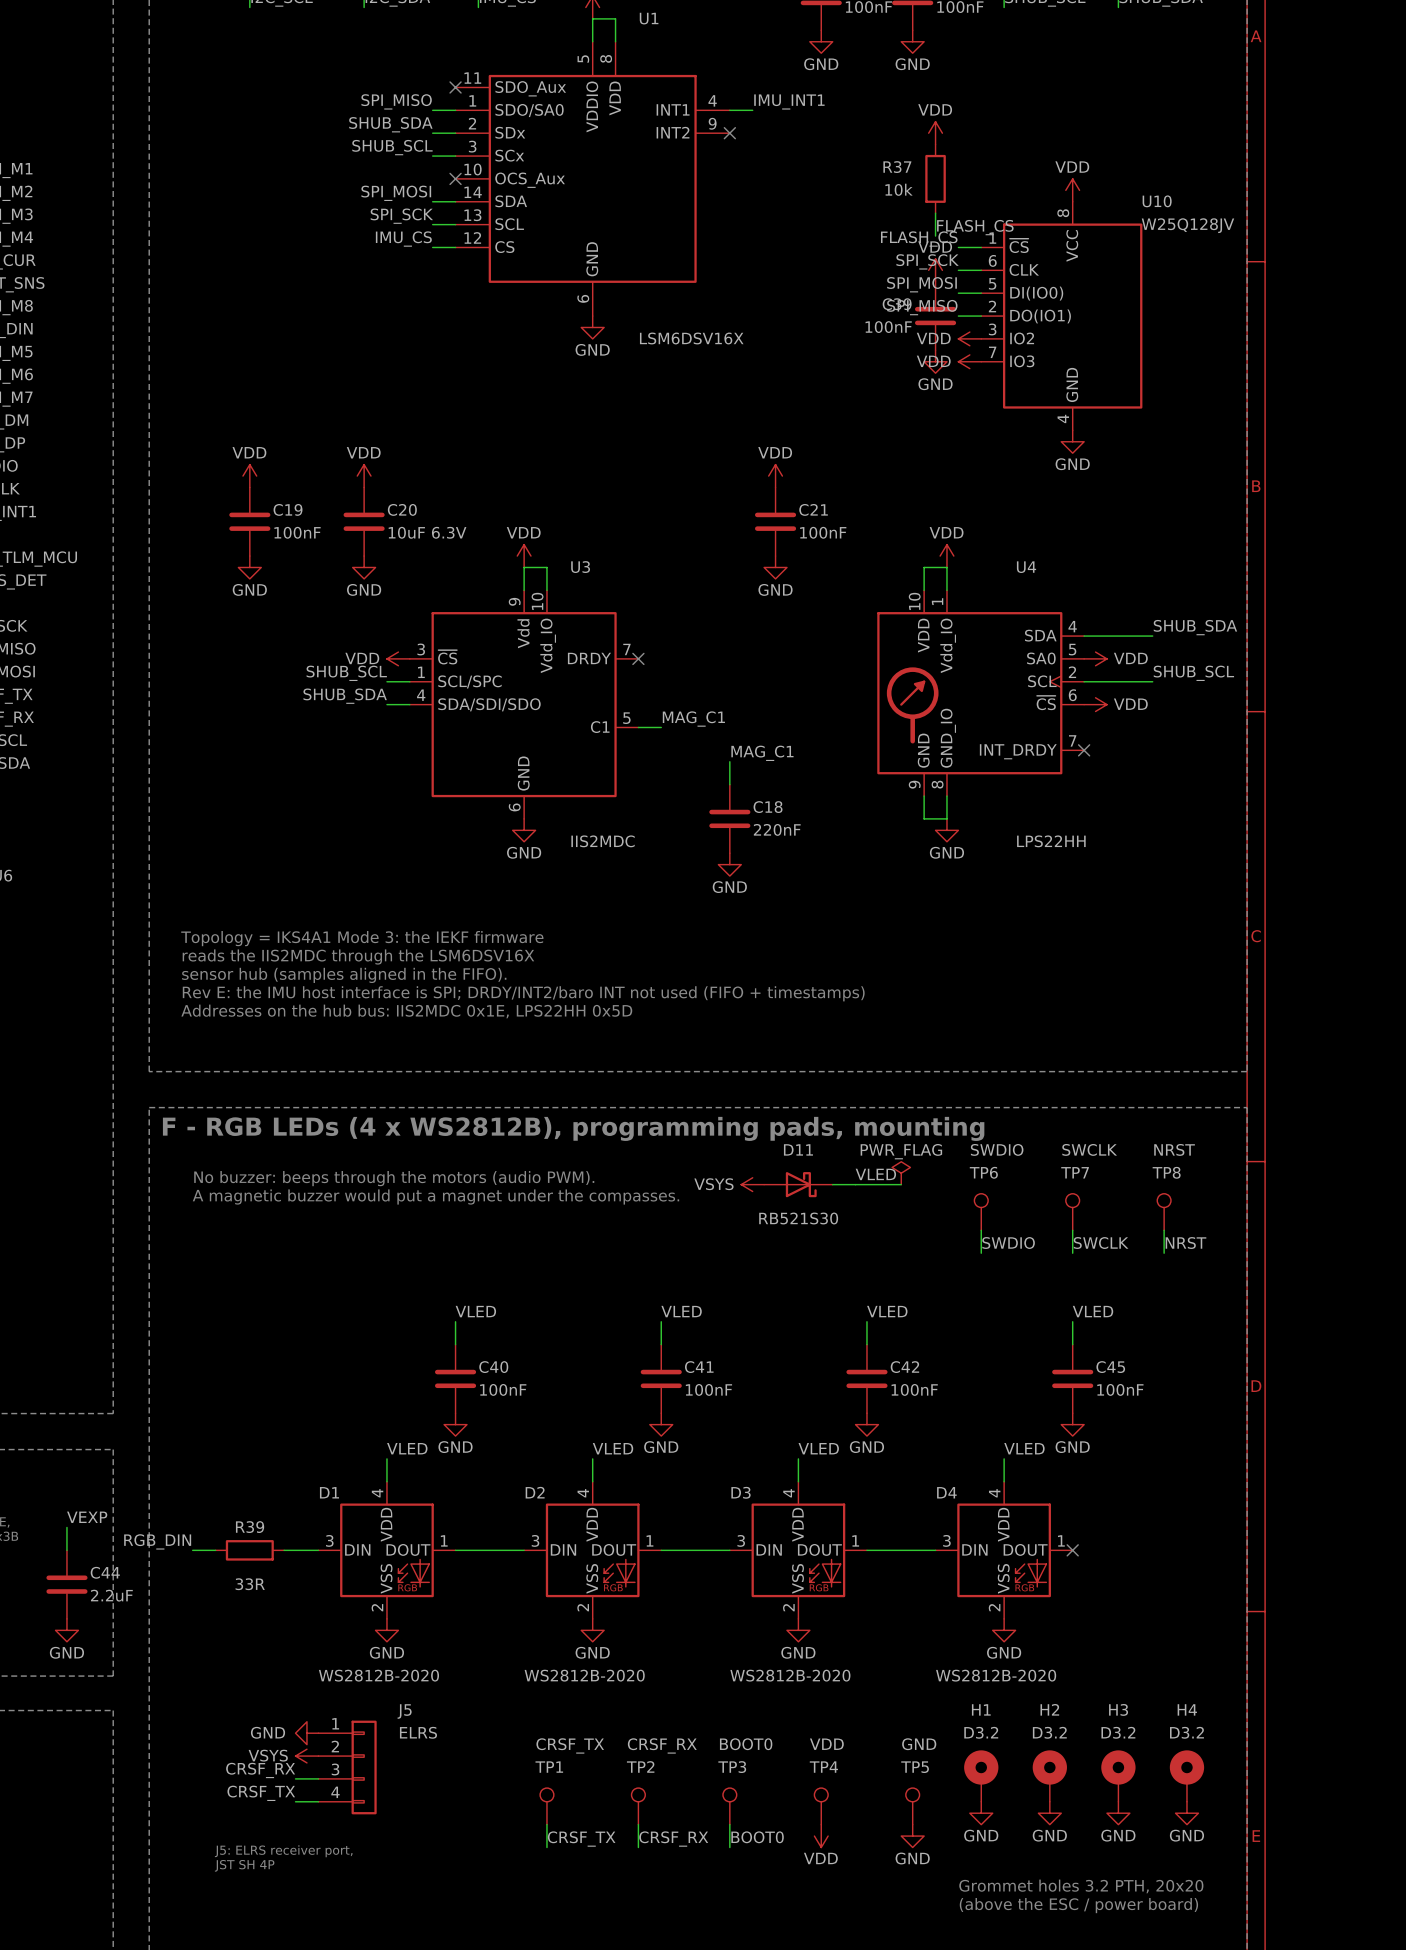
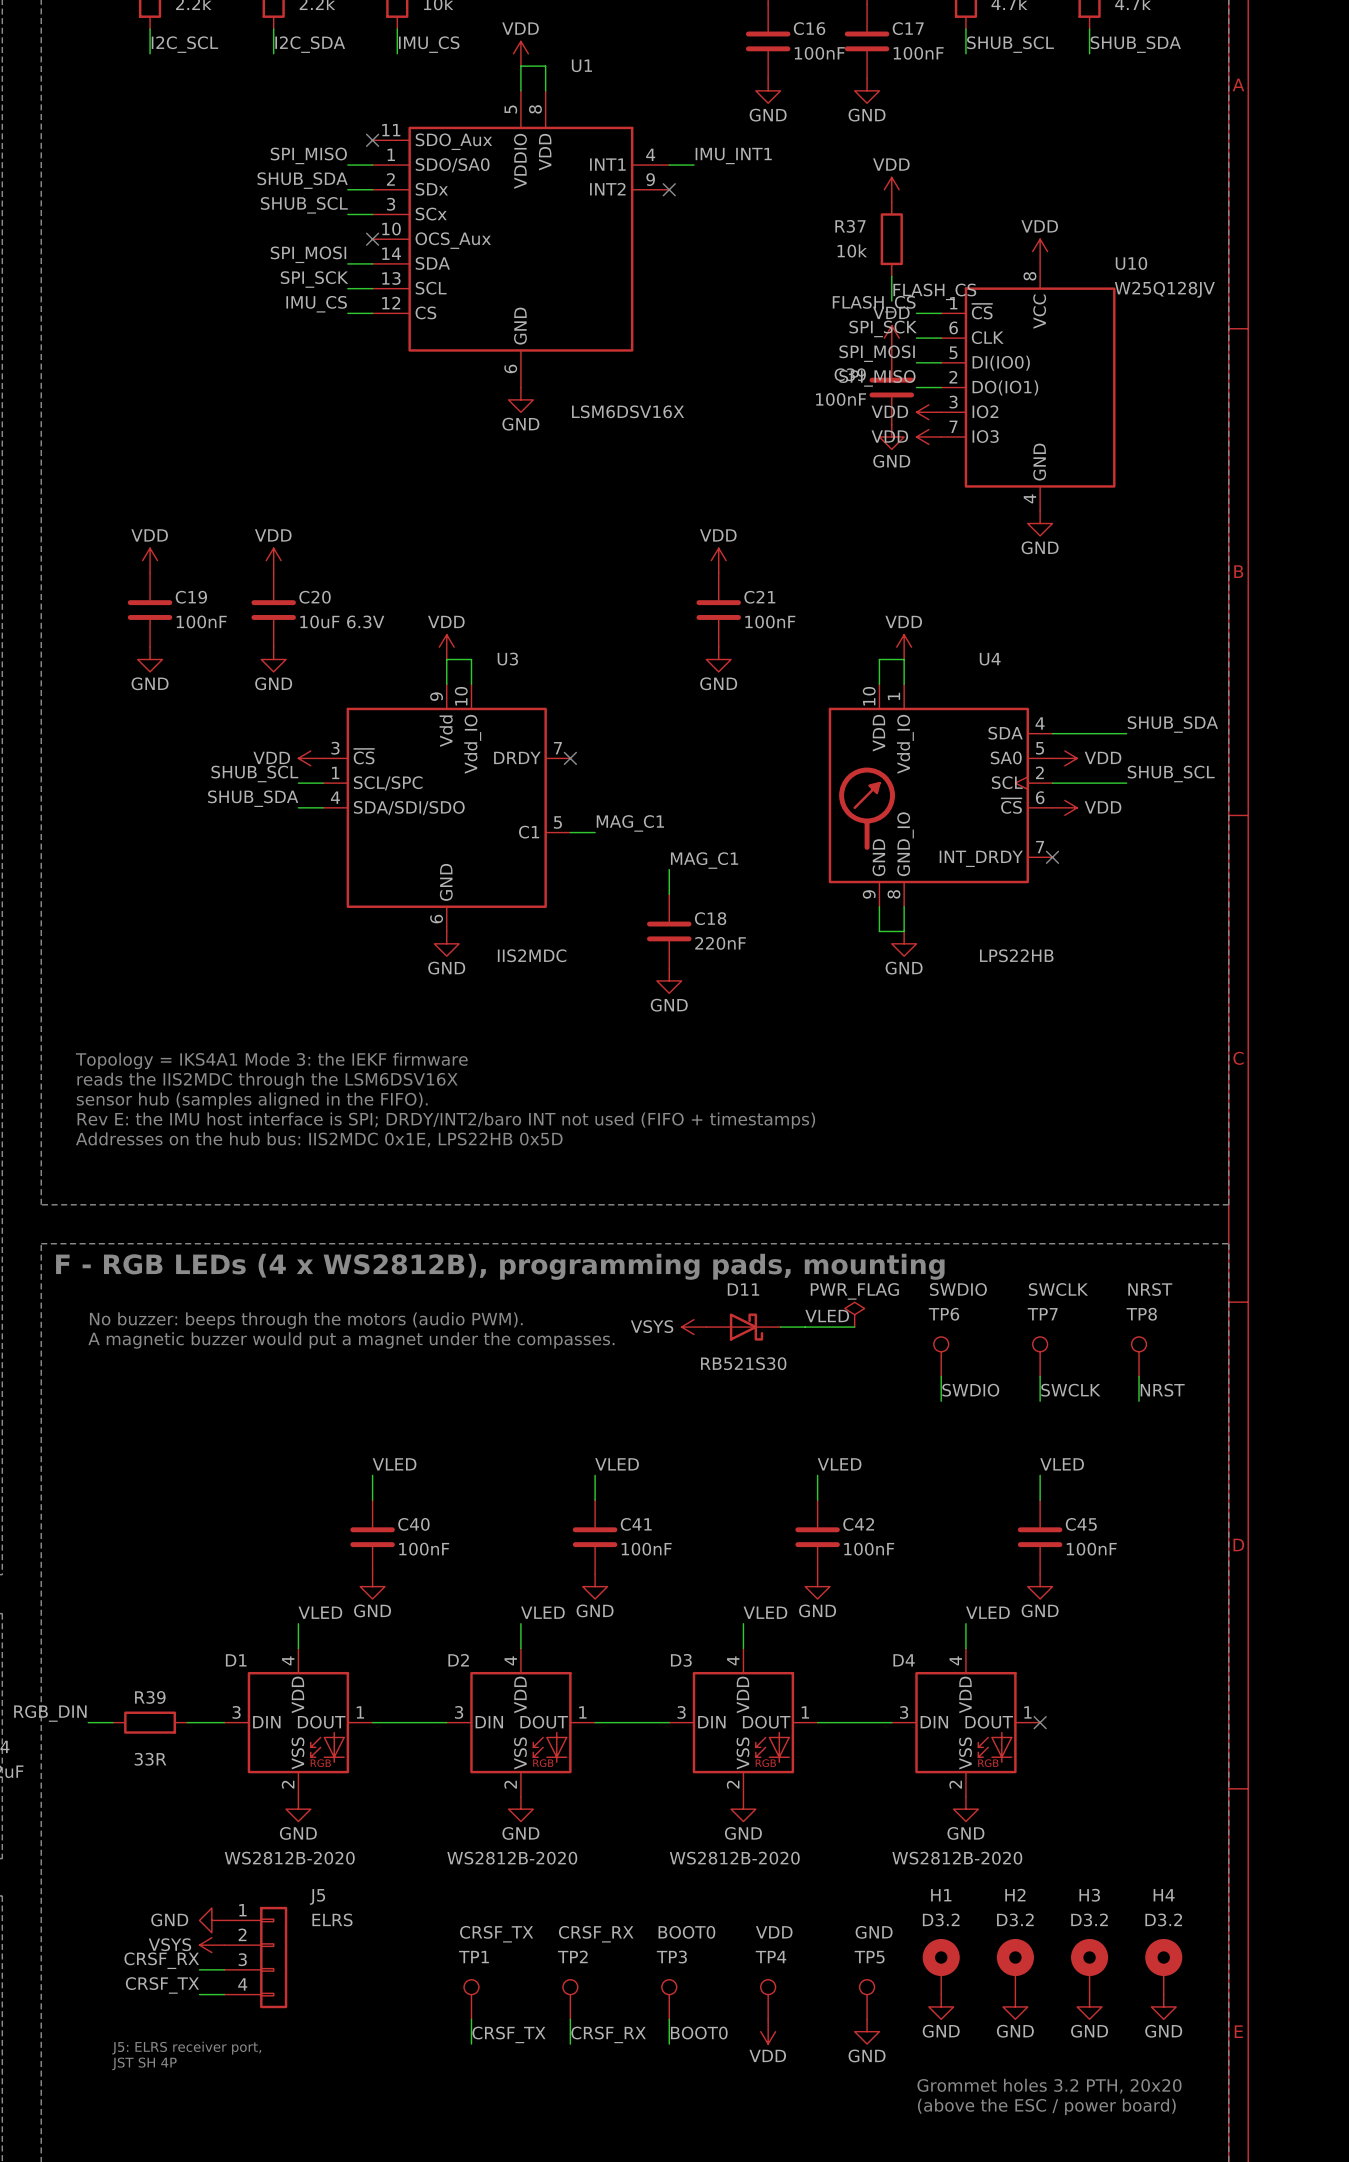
U4 value: LPS22HH (1051, 841) -> LPS22HB (1016, 955)
text: Addresses on the hub bus: IIS2MDC 0x1E, LPS22HH 0x5D (406, 1011) -> Addresses on the hub bus: IIS2MDC 0x1E, LPS22HB 0x5D (319, 1139)

